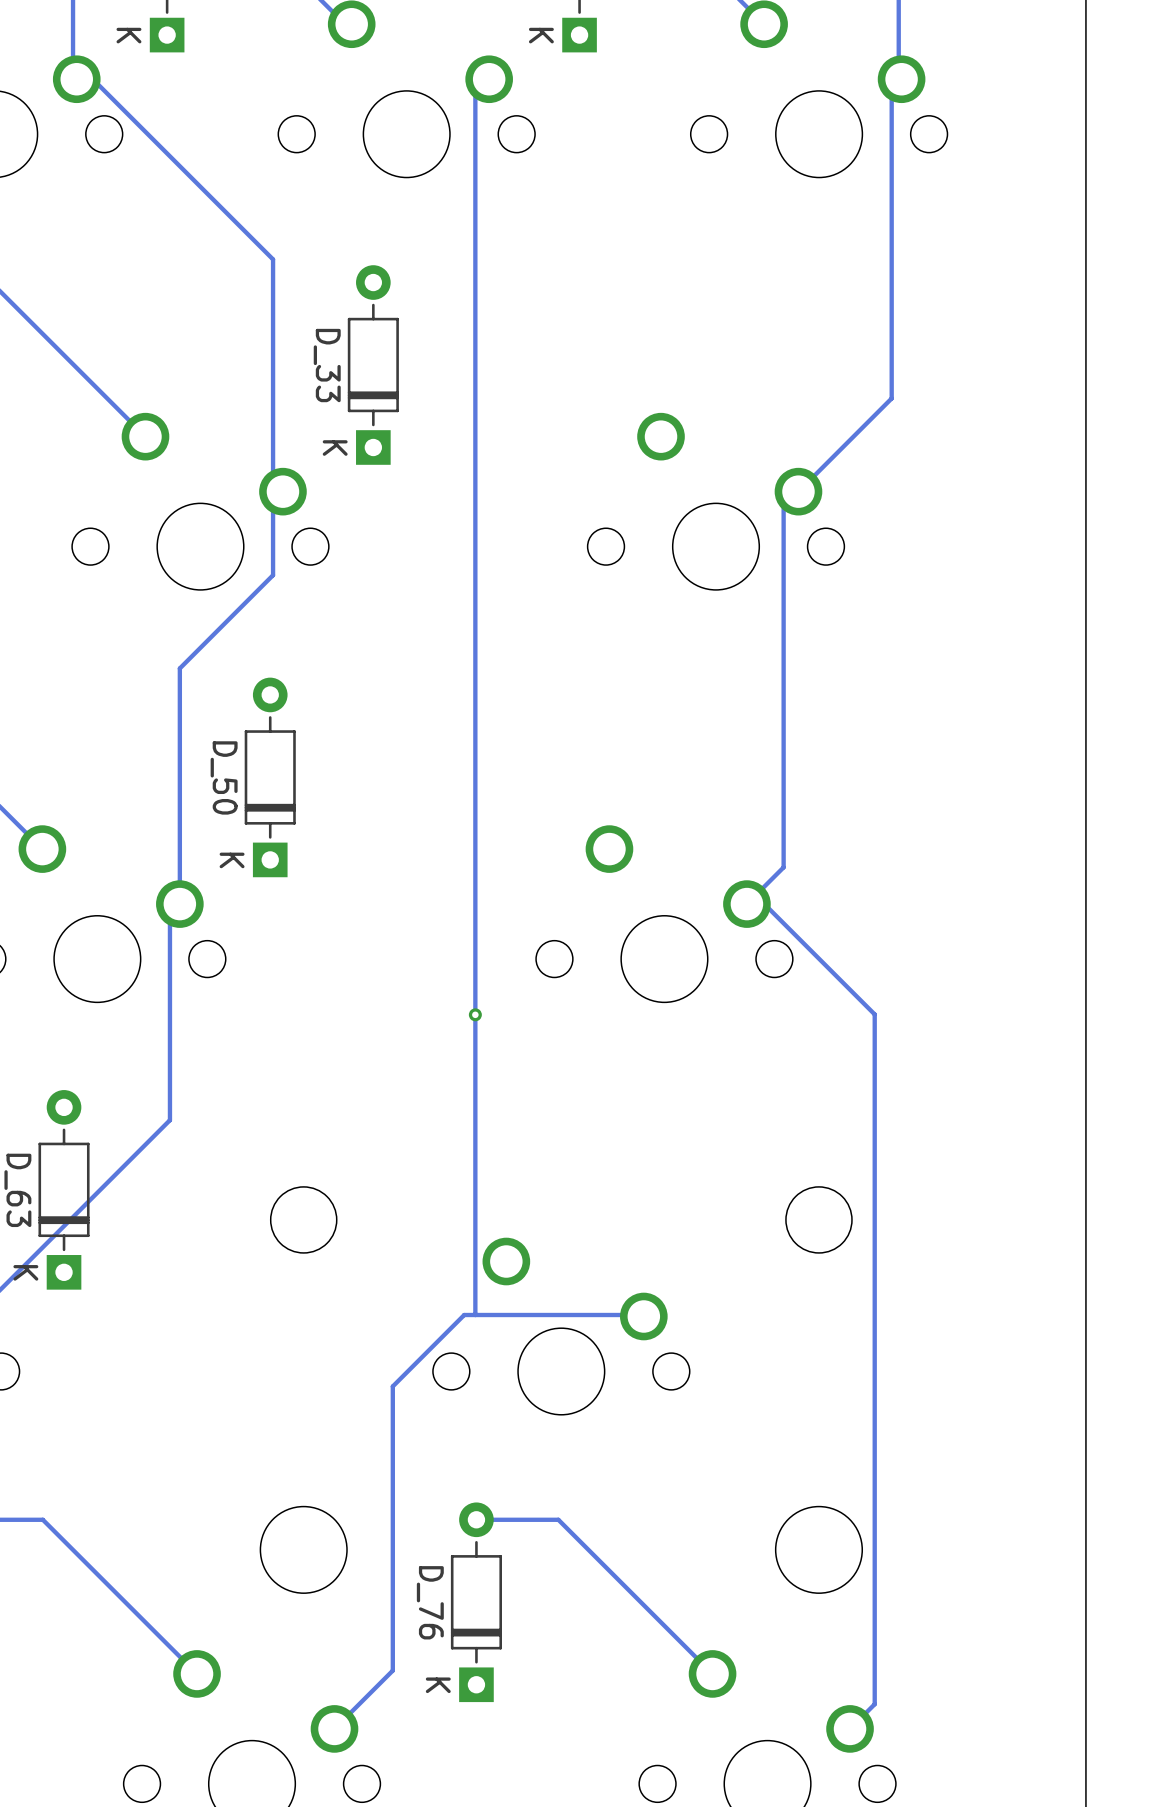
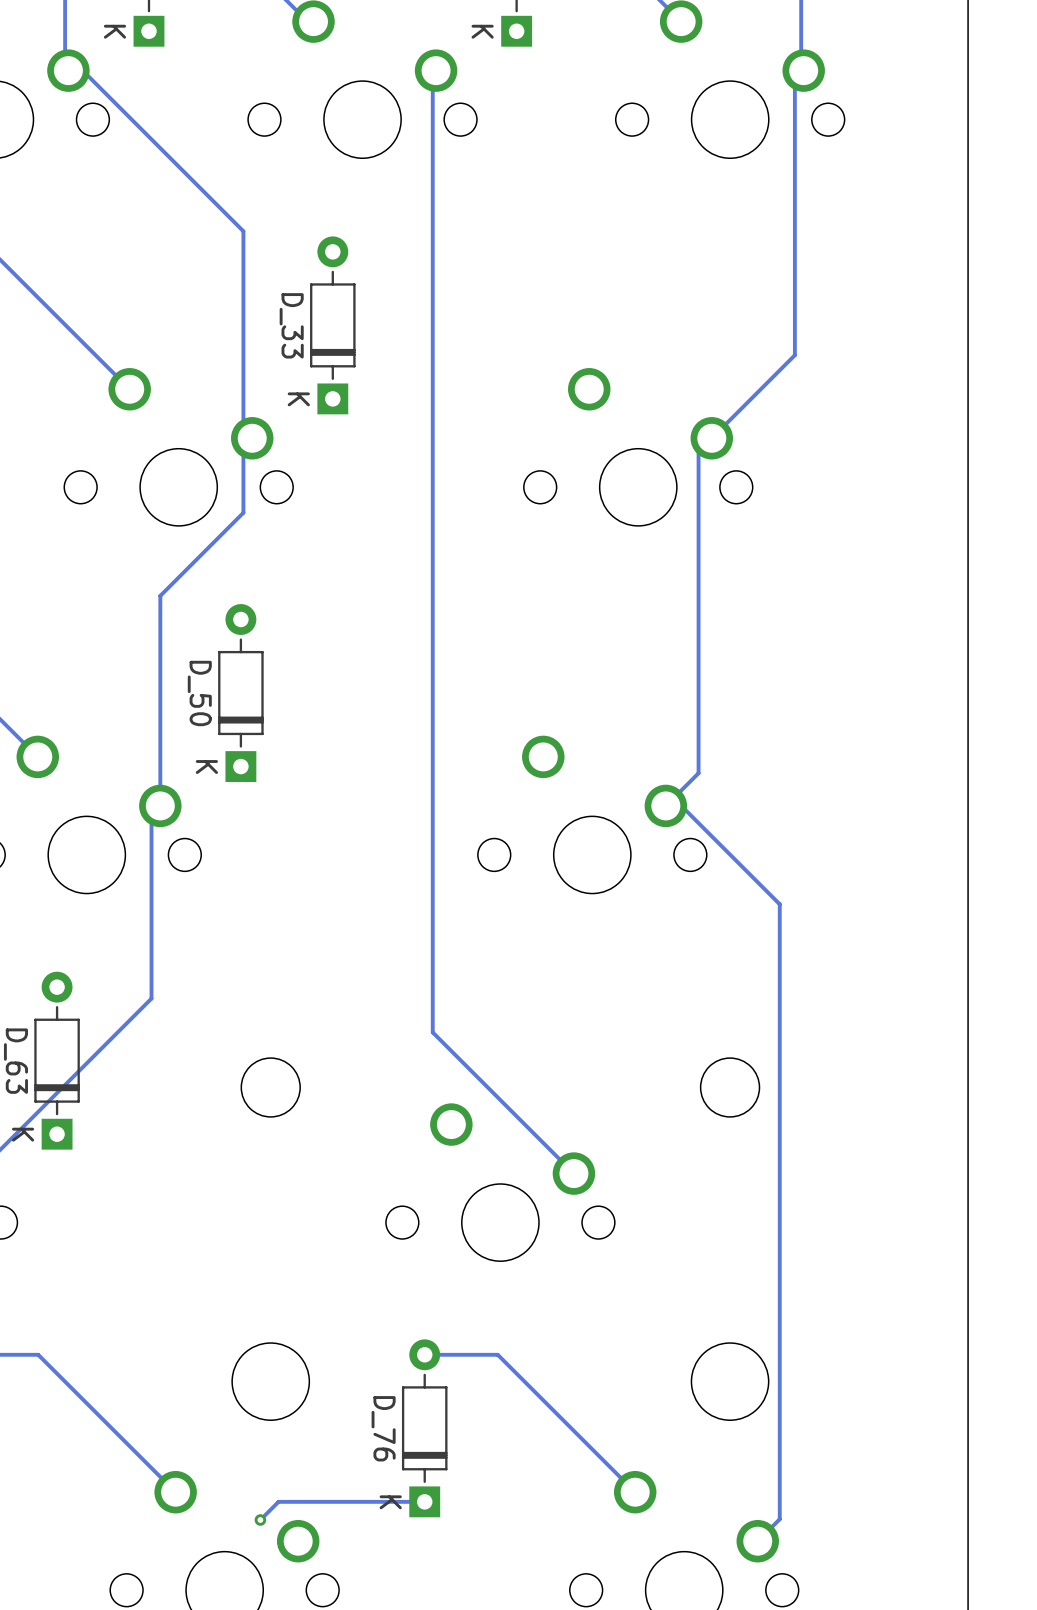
track: (485, 82) (475, 93) (475, 1315) -> (432, 73) (432, 1032) (572, 1172)
via: (475, 1014) -> none
track: (642, 1315) (464, 1315) (392, 1386) (392, 1670) (334, 1728) -> none
track: none -> (424, 1501) (278, 1501) (260, 1520)
via: none -> (260, 1520)

